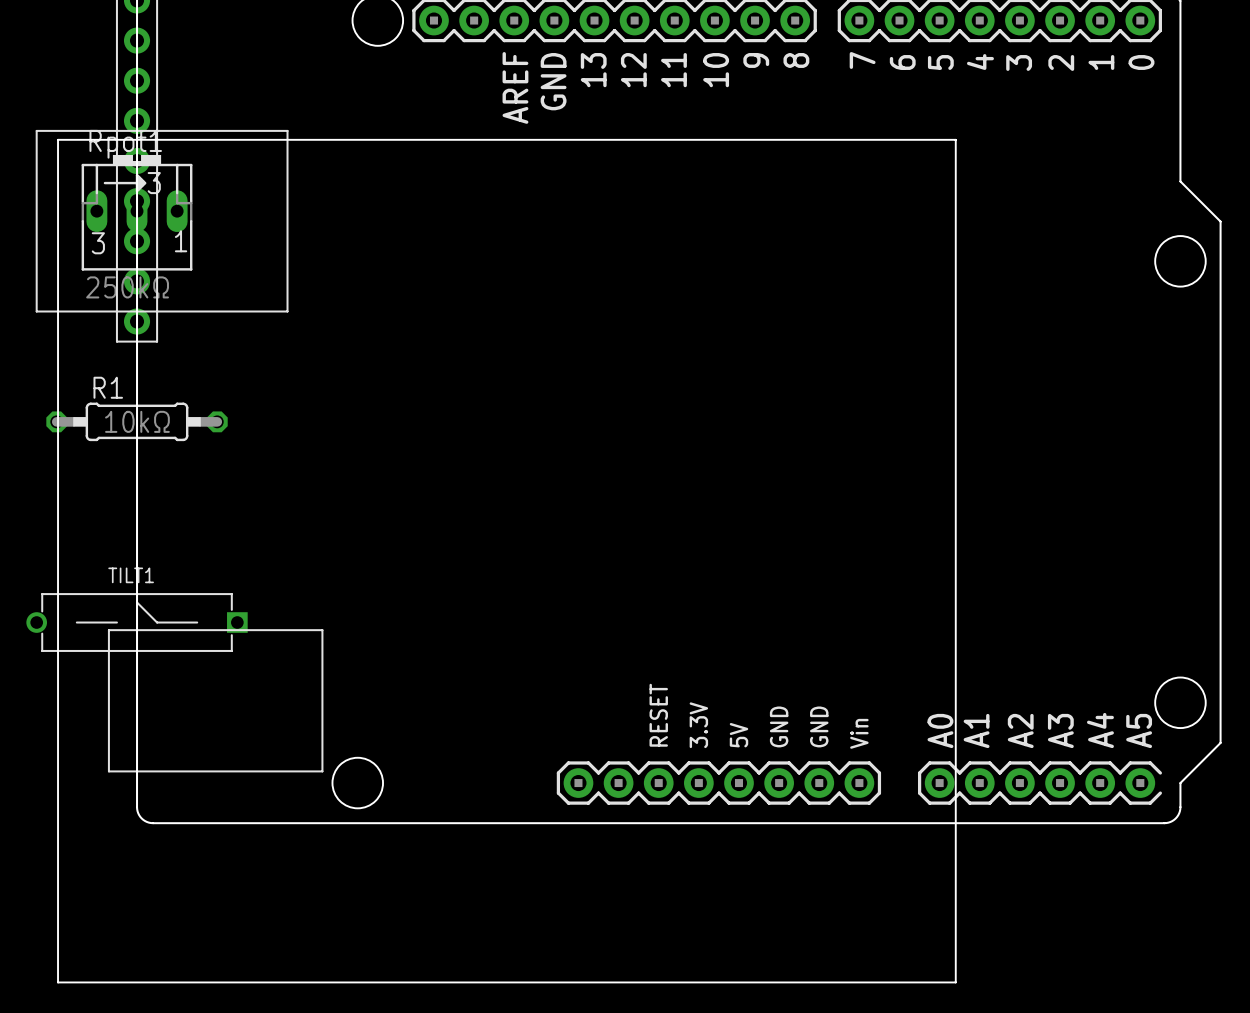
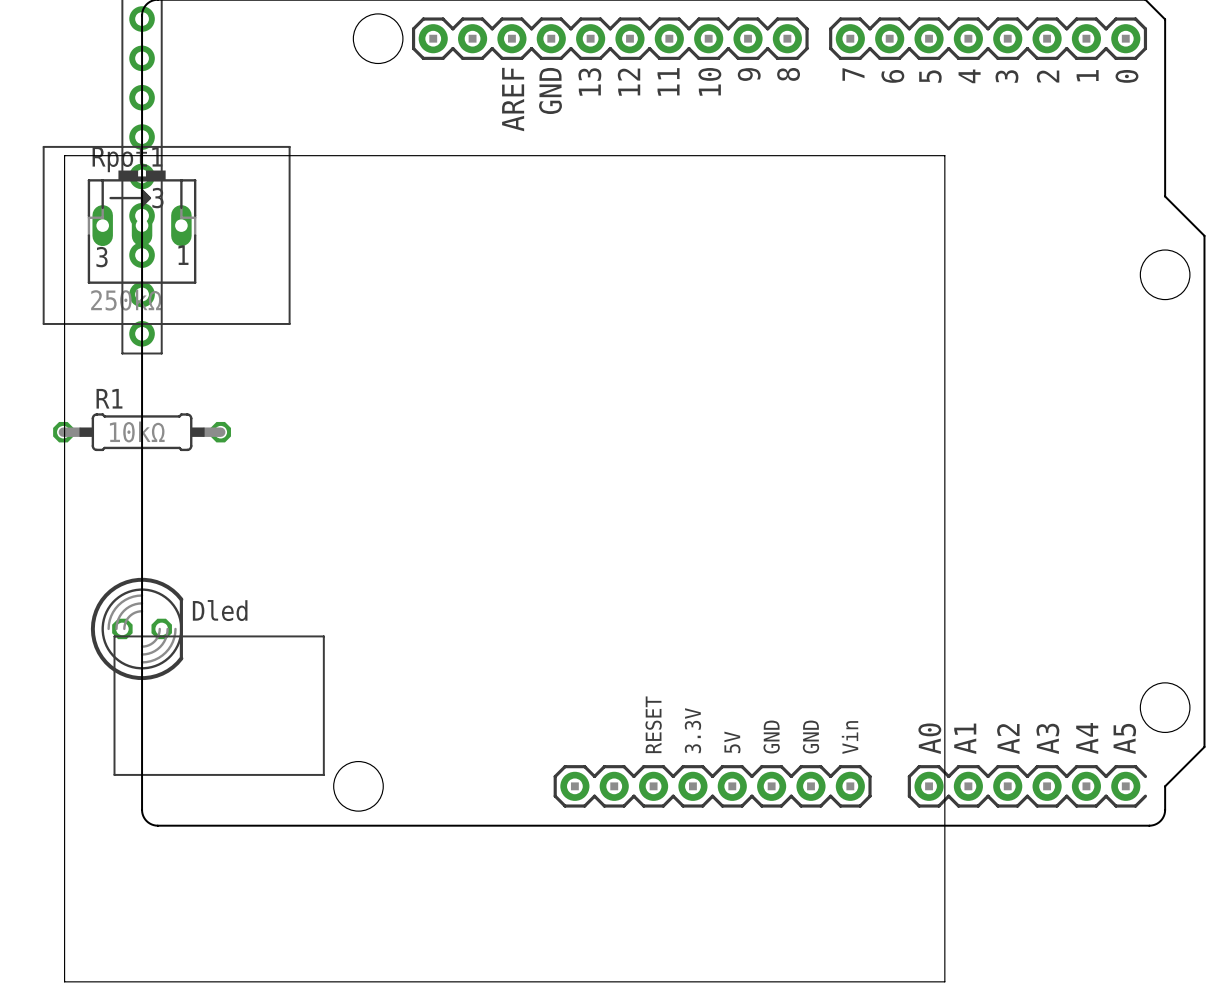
Dled: none -> (137, 628)
TILT1: (137, 622) -> none

